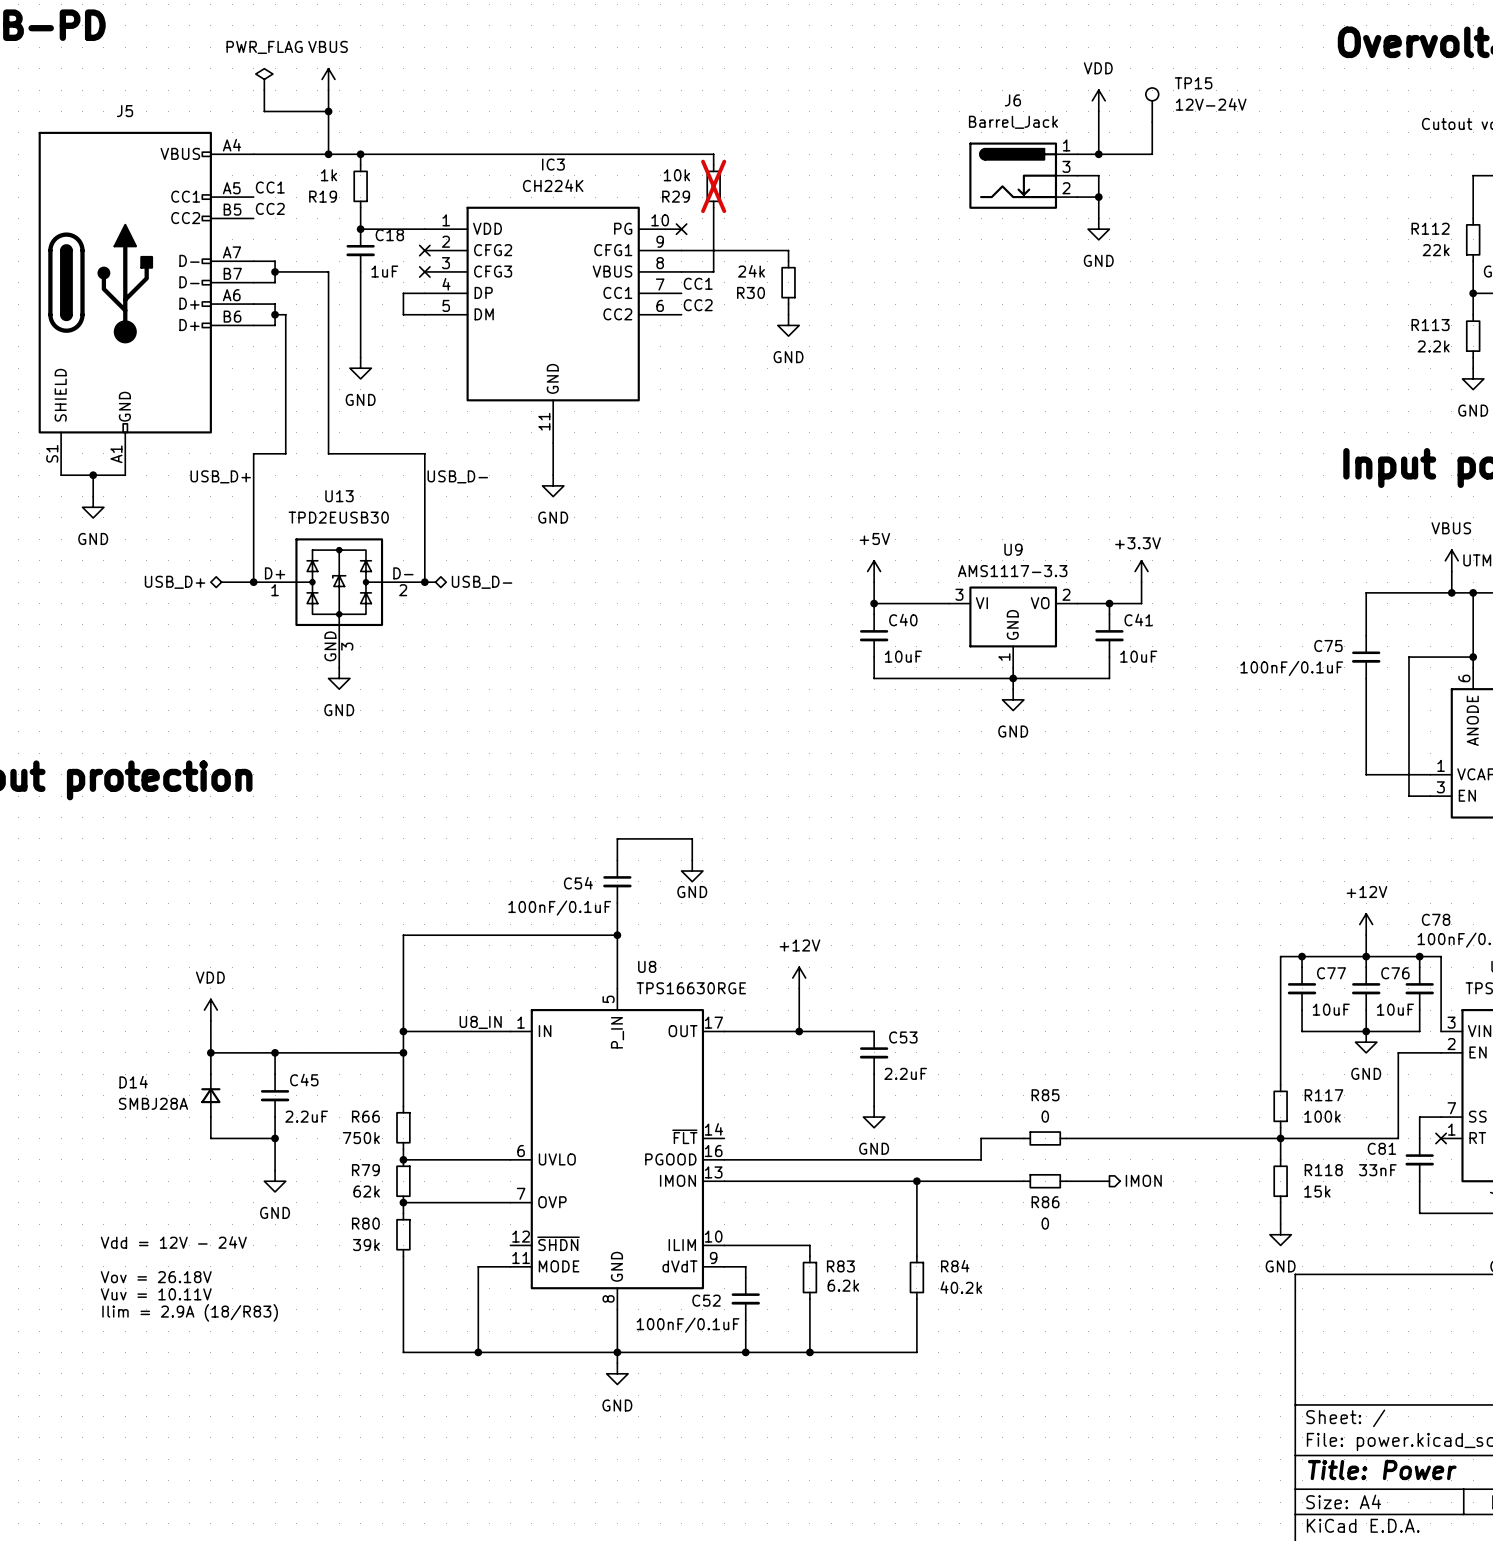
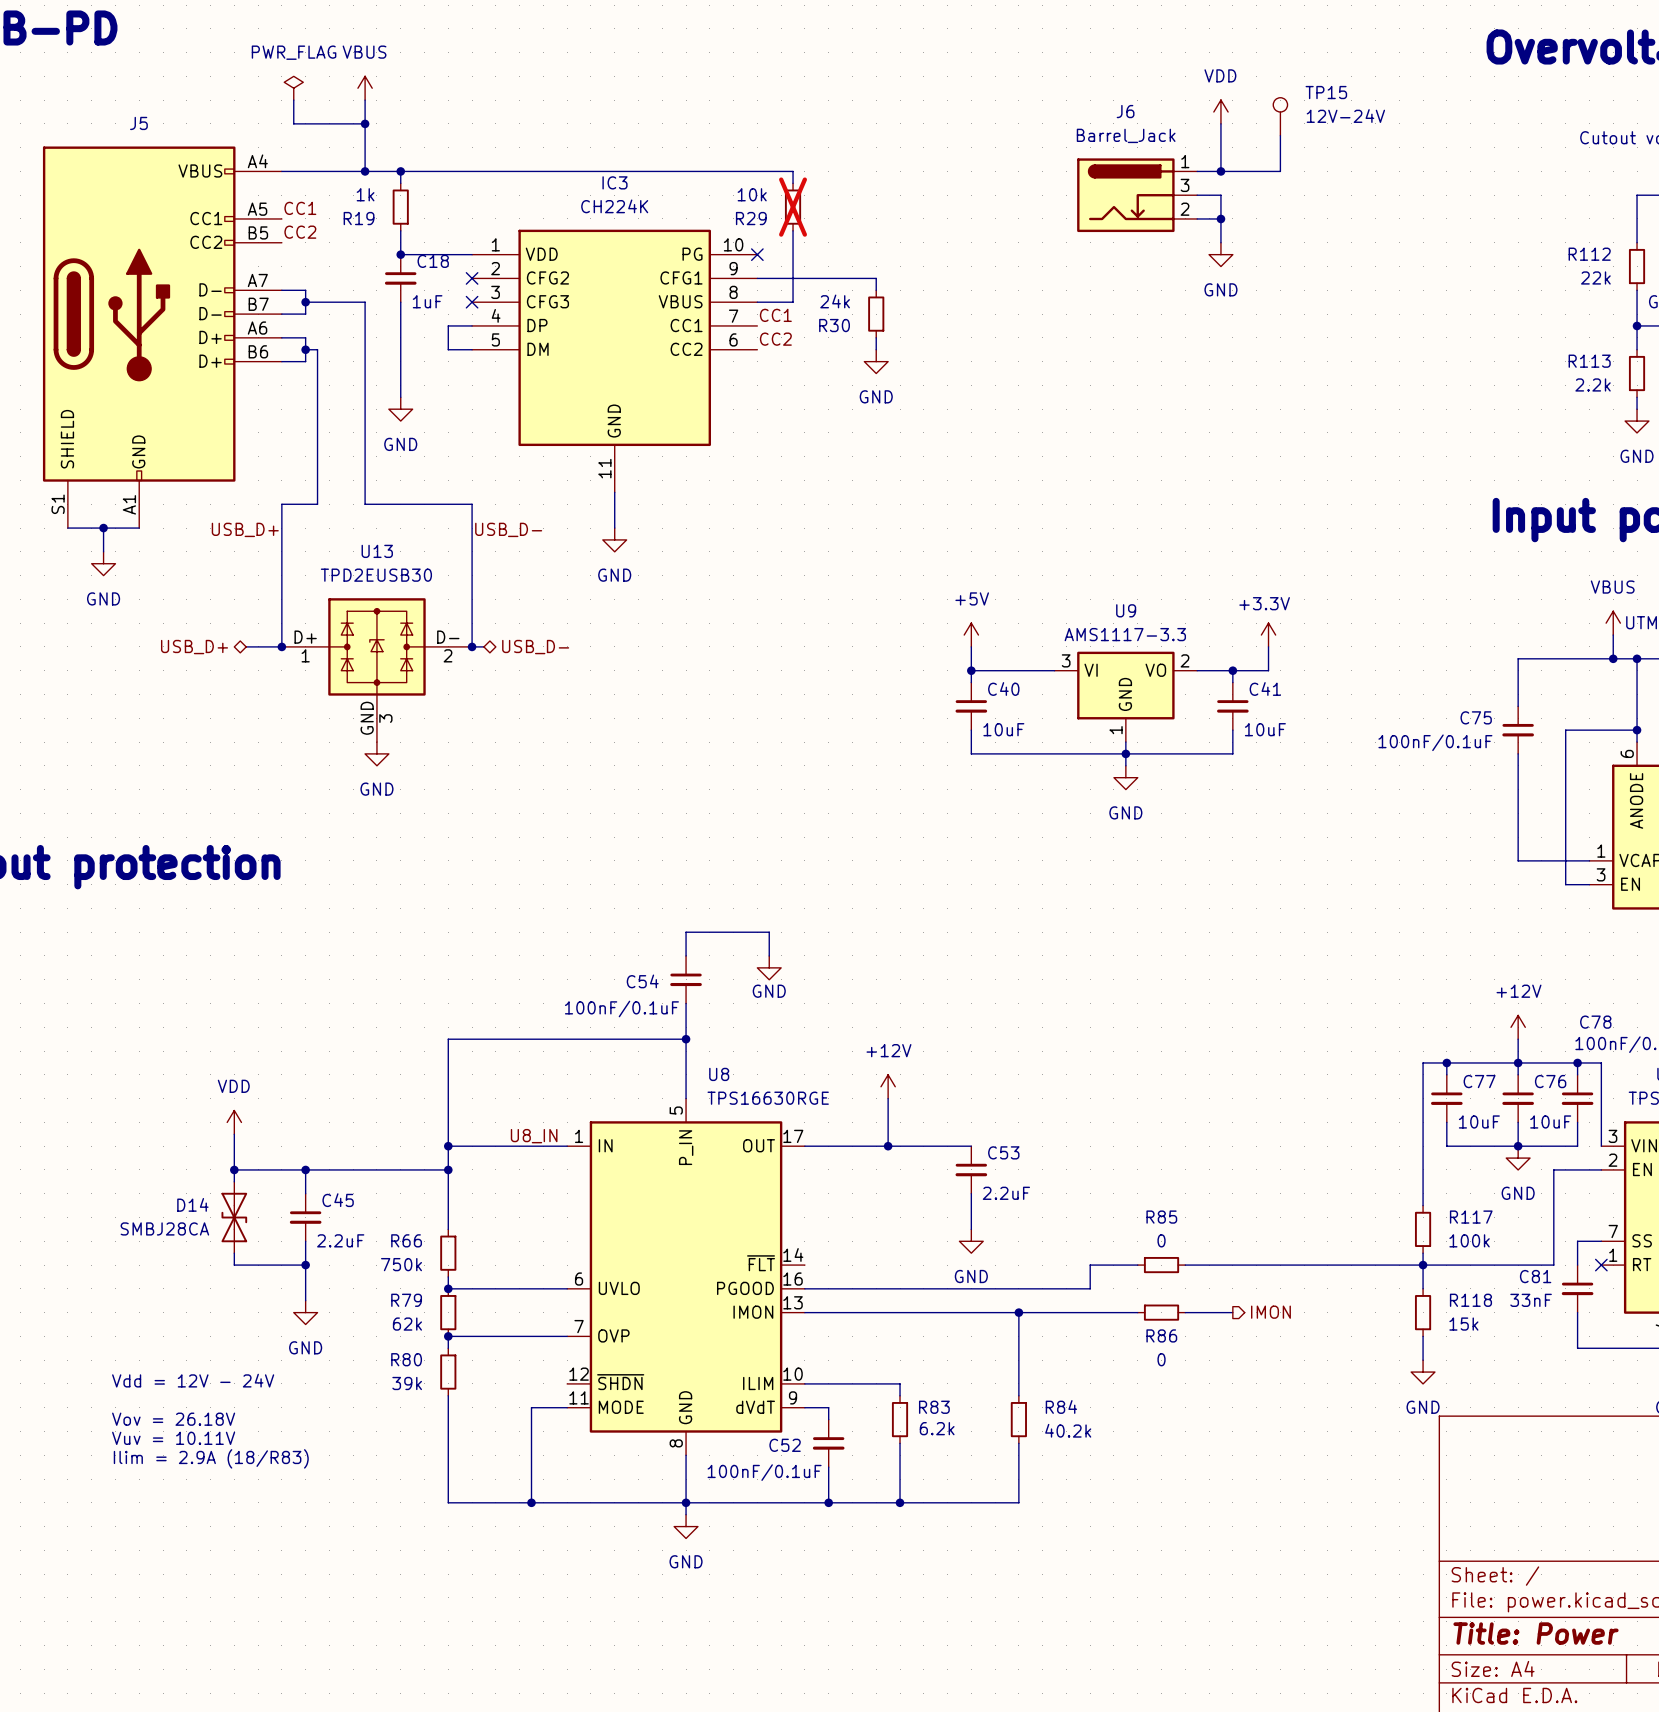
D14 symbol: [201, 1074, 221, 1118] -> [221, 1181, 248, 1254]
D14 name position: D14 (133, 1082) -> D14 (192, 1204)
D14 value: SMBJ28A (153, 1103) -> SMBJ28CA (164, 1228)

